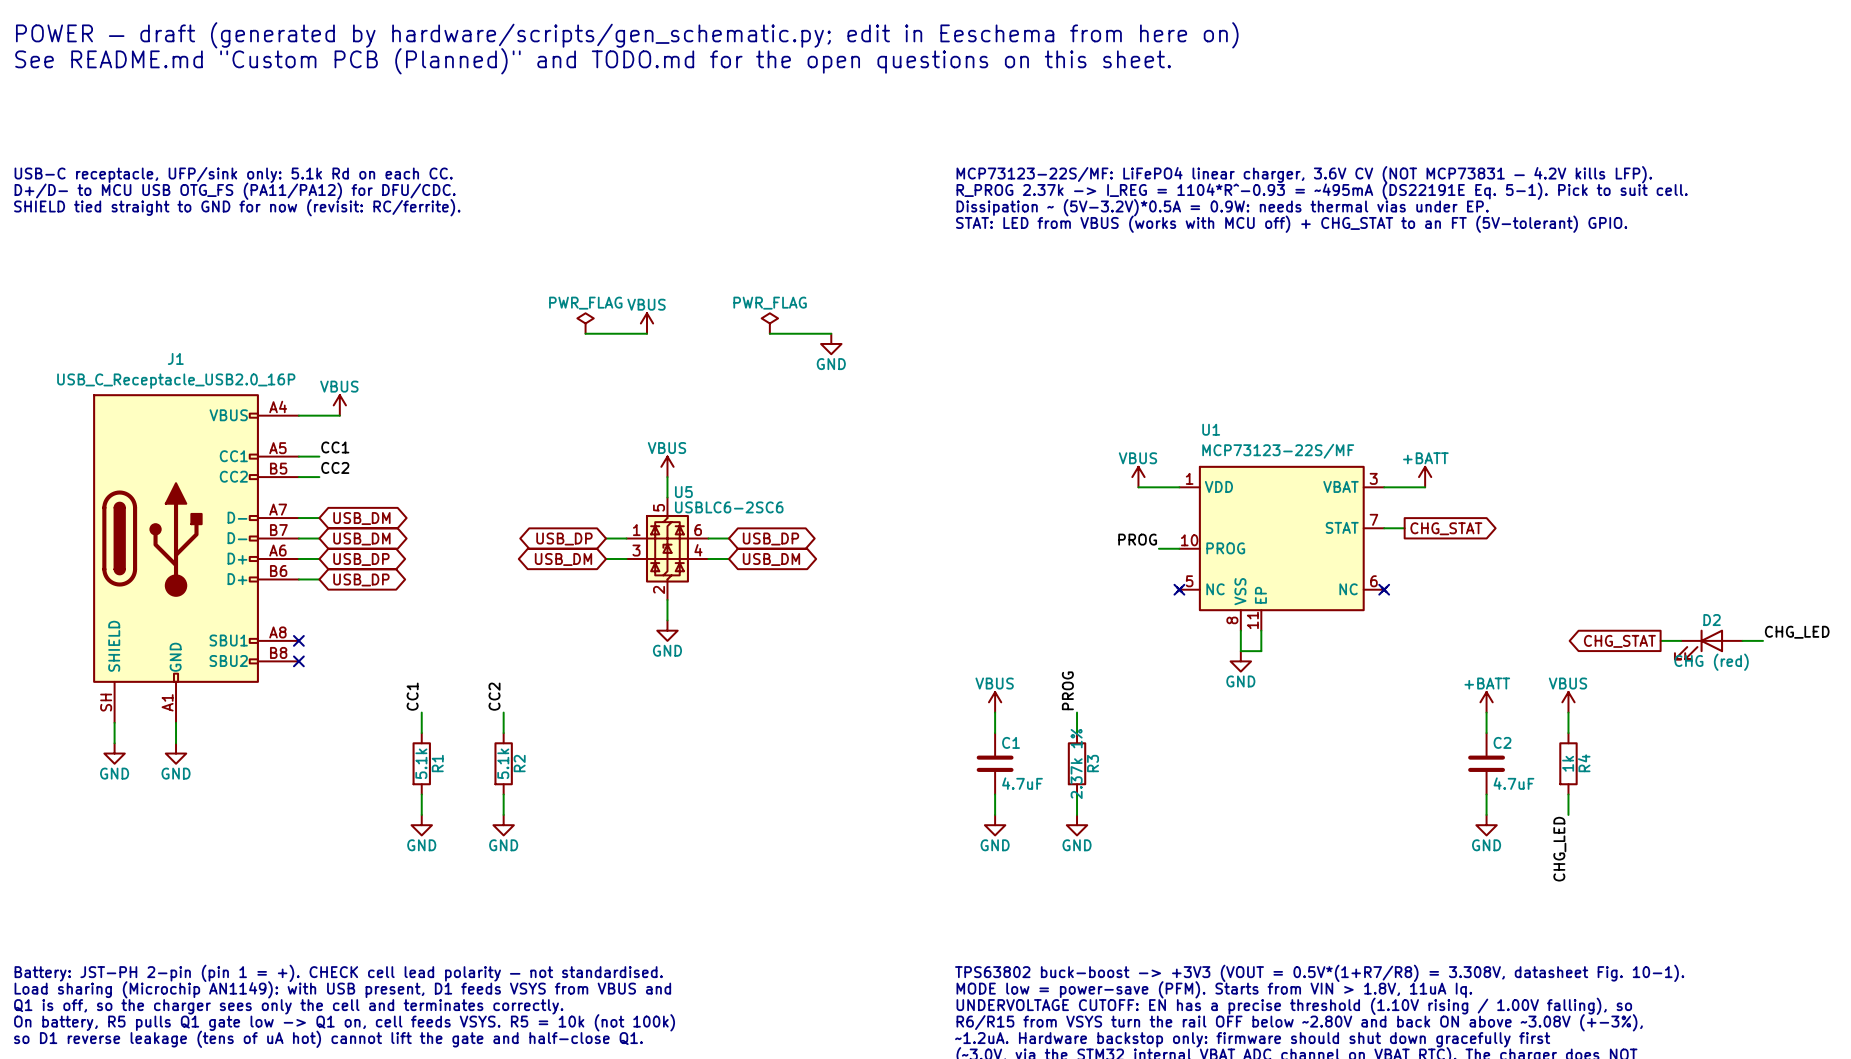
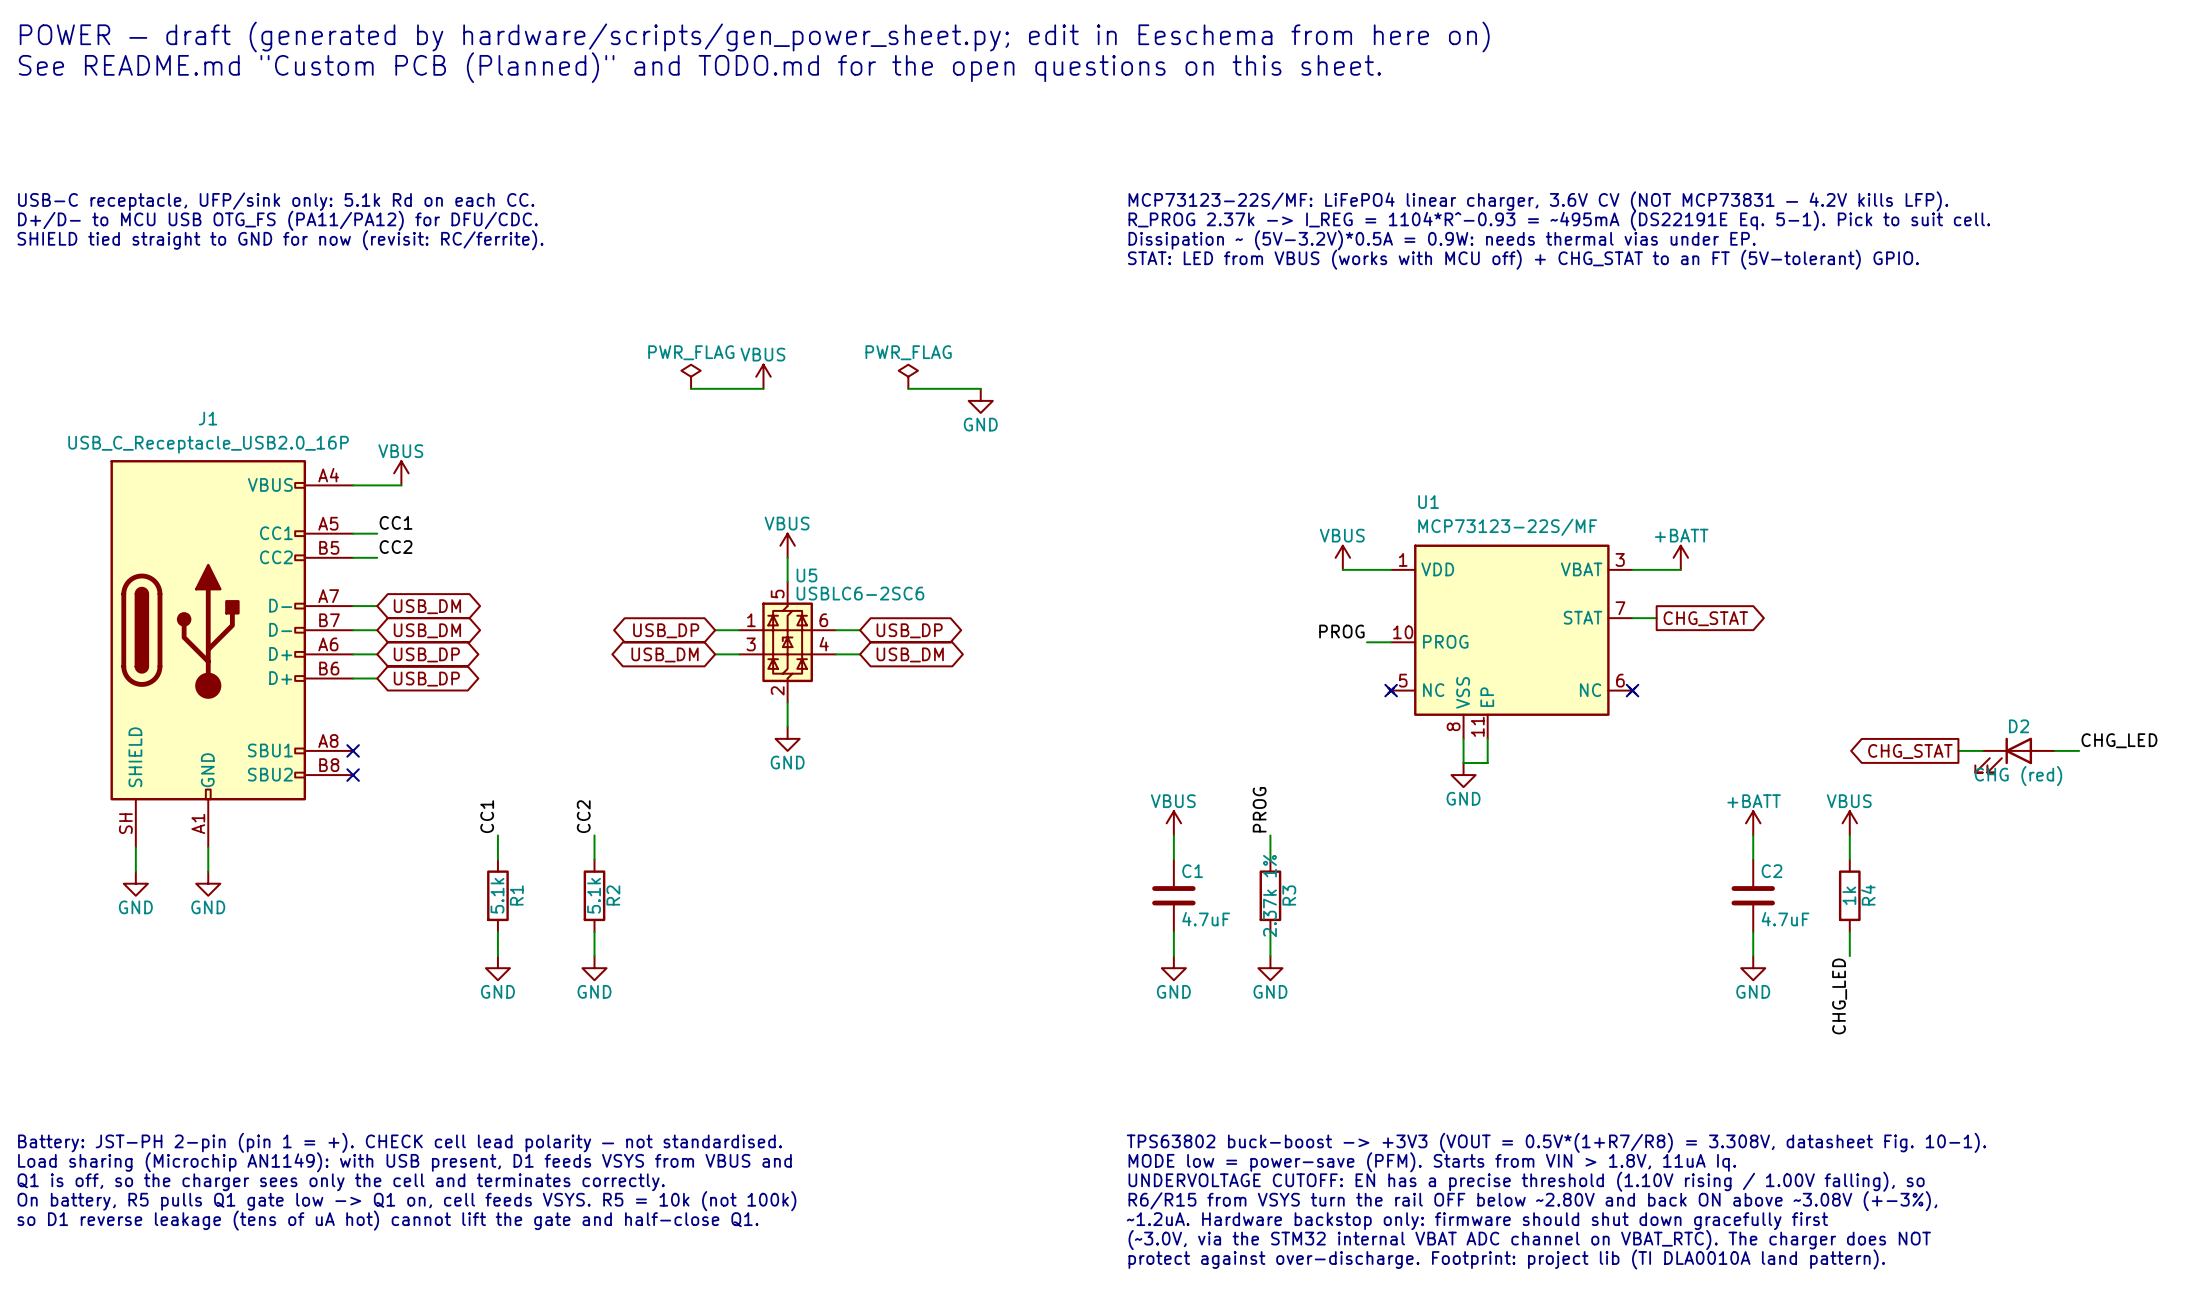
text: POWER — draft (generated by hardware/scripts/gen_schematic.py; edit in Eeschema from here on) (627, 35) -> POWER — draft (generated by hardware/scripts/gen_power_sheet.py; edit in Eeschema from here on) (754, 37)

